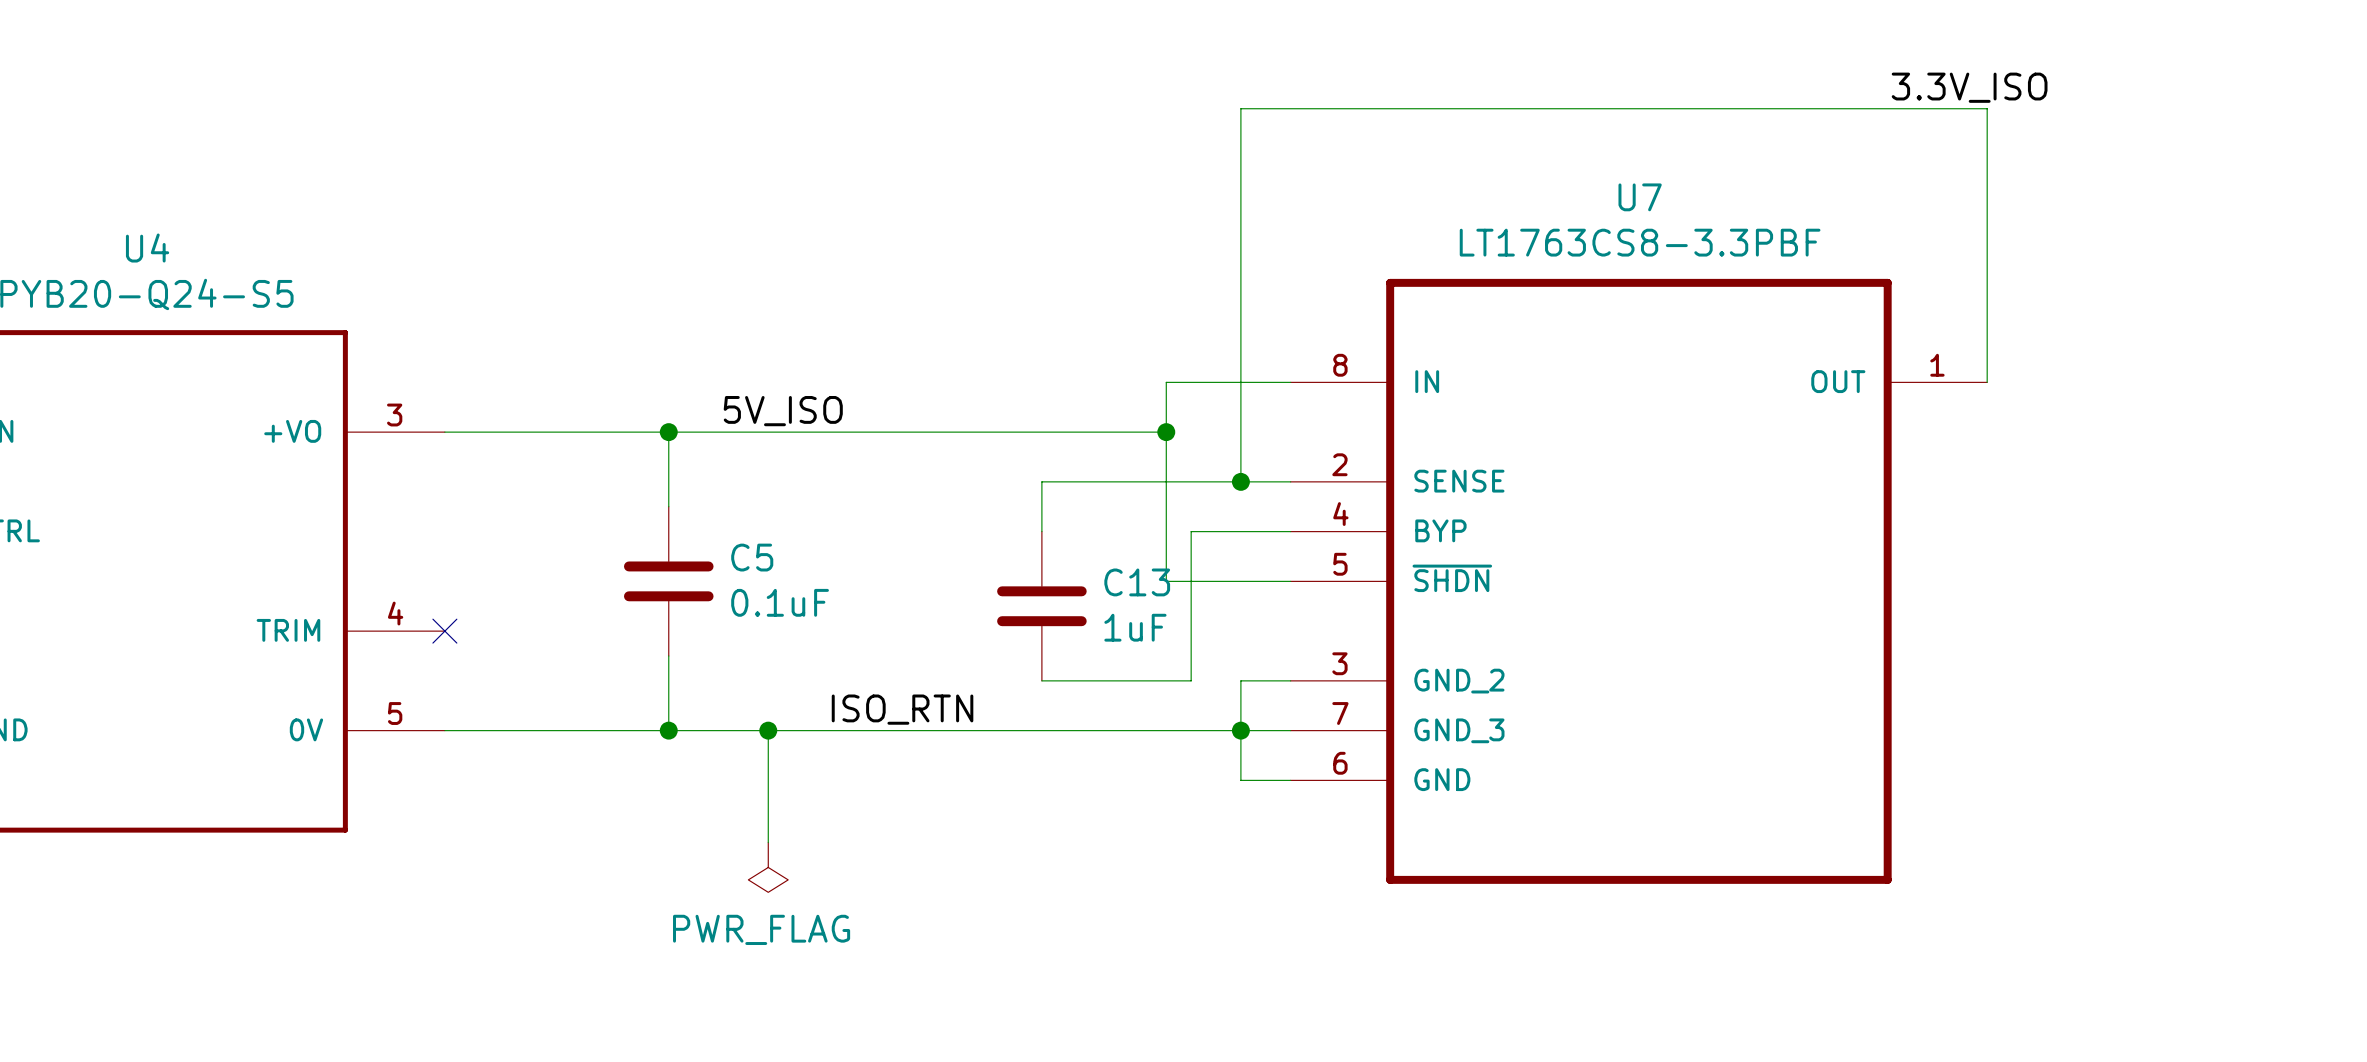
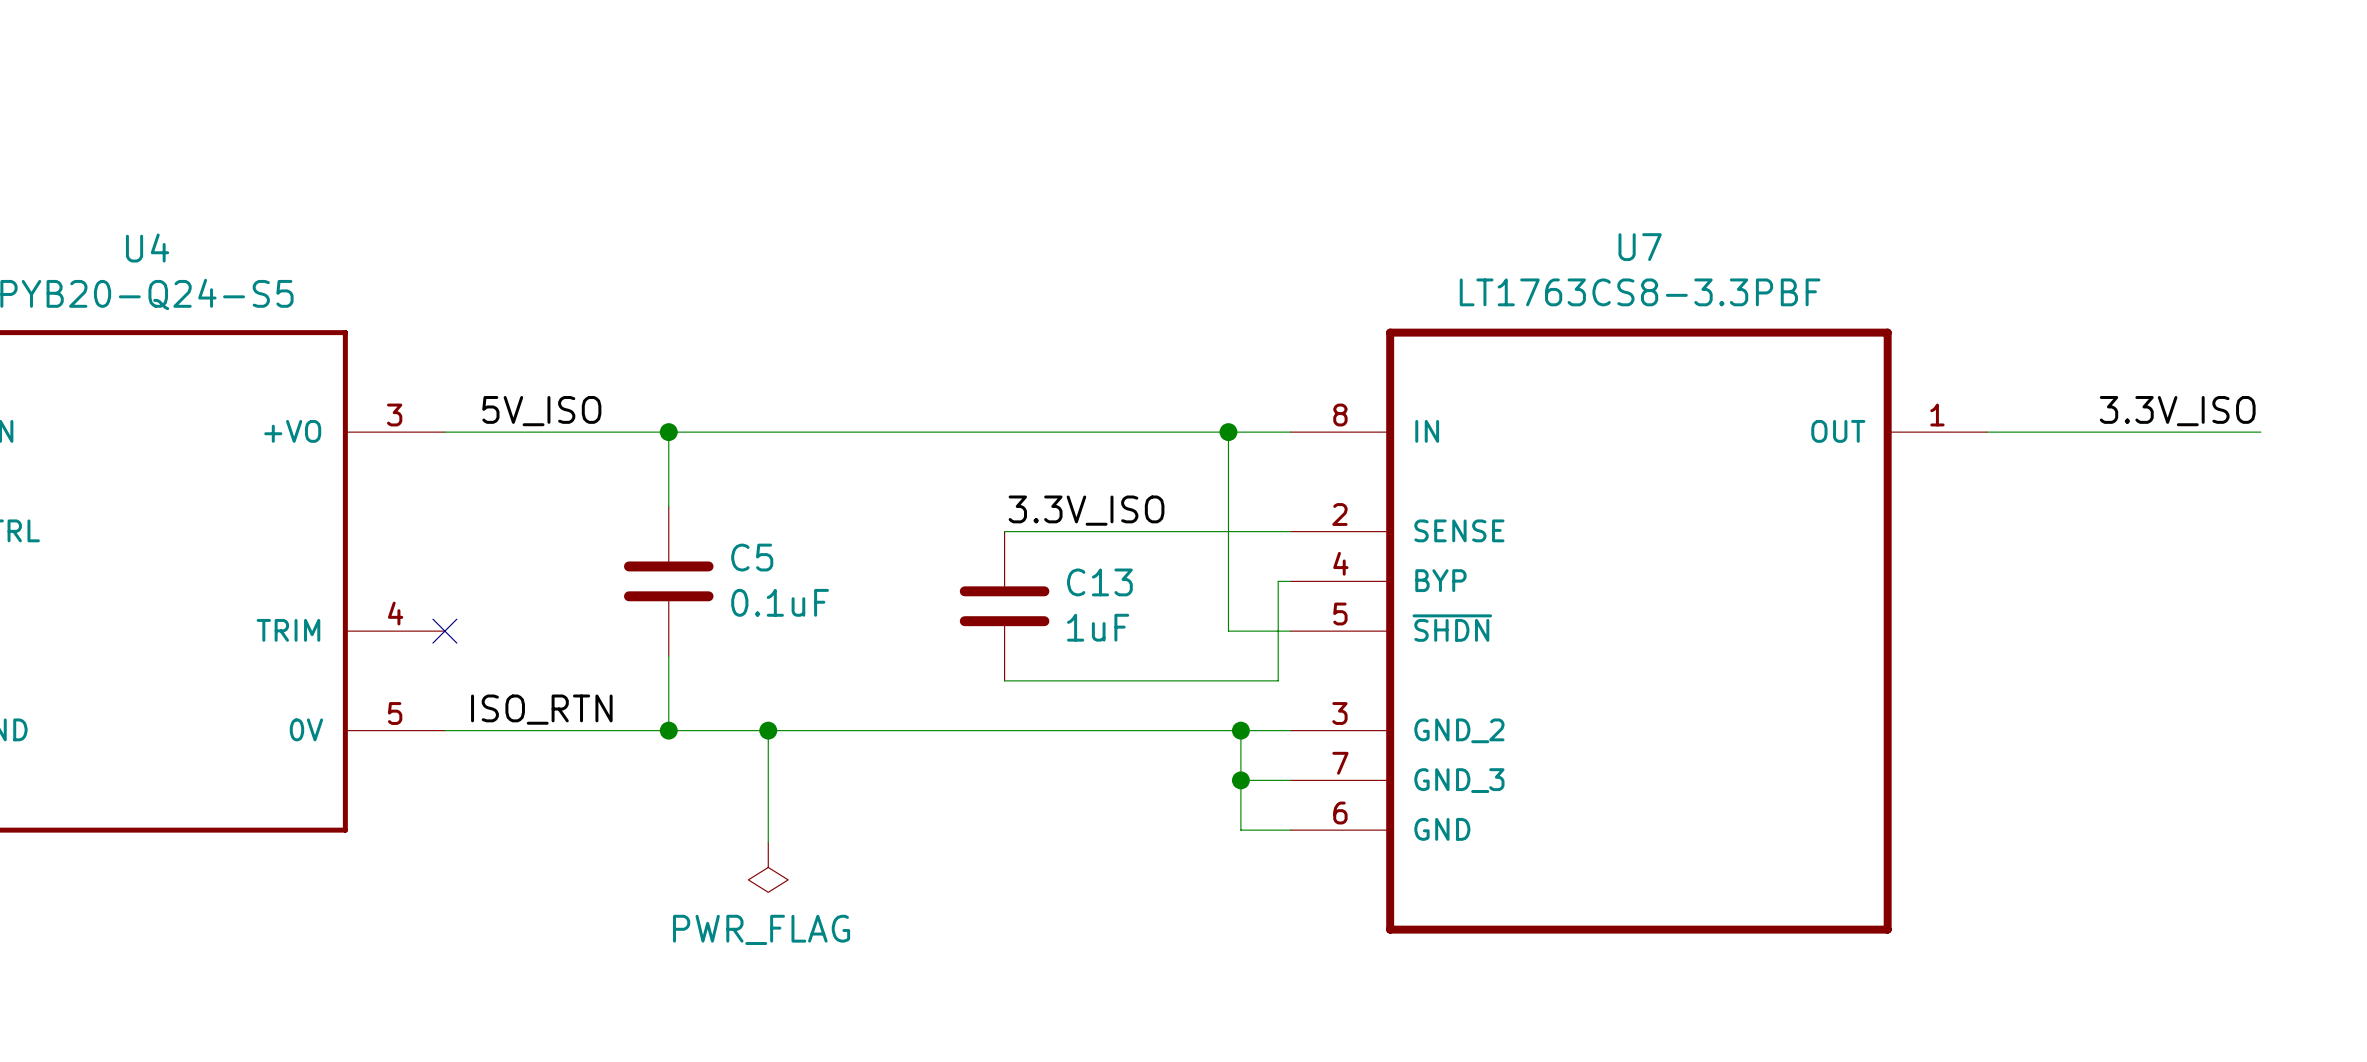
label: 3.3V_ISO (1969, 87) -> none
wire: (1290, 382) (1166, 382) (1166, 581) (1278, 581) -> none
wire: (1987, 382) (1987, 108) (1240, 108) (1240, 481) -> none
label position: 5V_ISO (783, 411) -> 5V_ISO (541, 411)
label: none -> 3.3V_ISO (2177, 411)
wire: none -> (1166, 432) (1290, 432)
junction: (1166, 432) -> none
wire: none -> (1228, 432) (1228, 631) (1290, 631)
junction: none -> (1228, 432)
wire: none -> (1987, 432) (2260, 432)
junction: (1240, 481) -> none
wire: (1290, 481) (1041, 481) (1041, 531) -> none
label: none -> 3.3V_ISO (1086, 510)
wire: (1191, 531) (1191, 680) -> (1191, 531) (1004, 531)
U7 position: (1638, 581) -> (1638, 631)
C13 position: (1041, 606) -> (1004, 606)
wire: none -> (1004, 680) (1041, 680)
wire: (1240, 680) (1240, 730) -> (1240, 680) (1191, 680)
wire: (1278, 680) (1290, 680) -> (1278, 680) (1278, 581)
label position: ISO_RTN (902, 709) -> ISO_RTN (541, 709)
wire: none -> (1240, 780) (1240, 830) (1290, 830)
junction: none -> (1240, 780)

